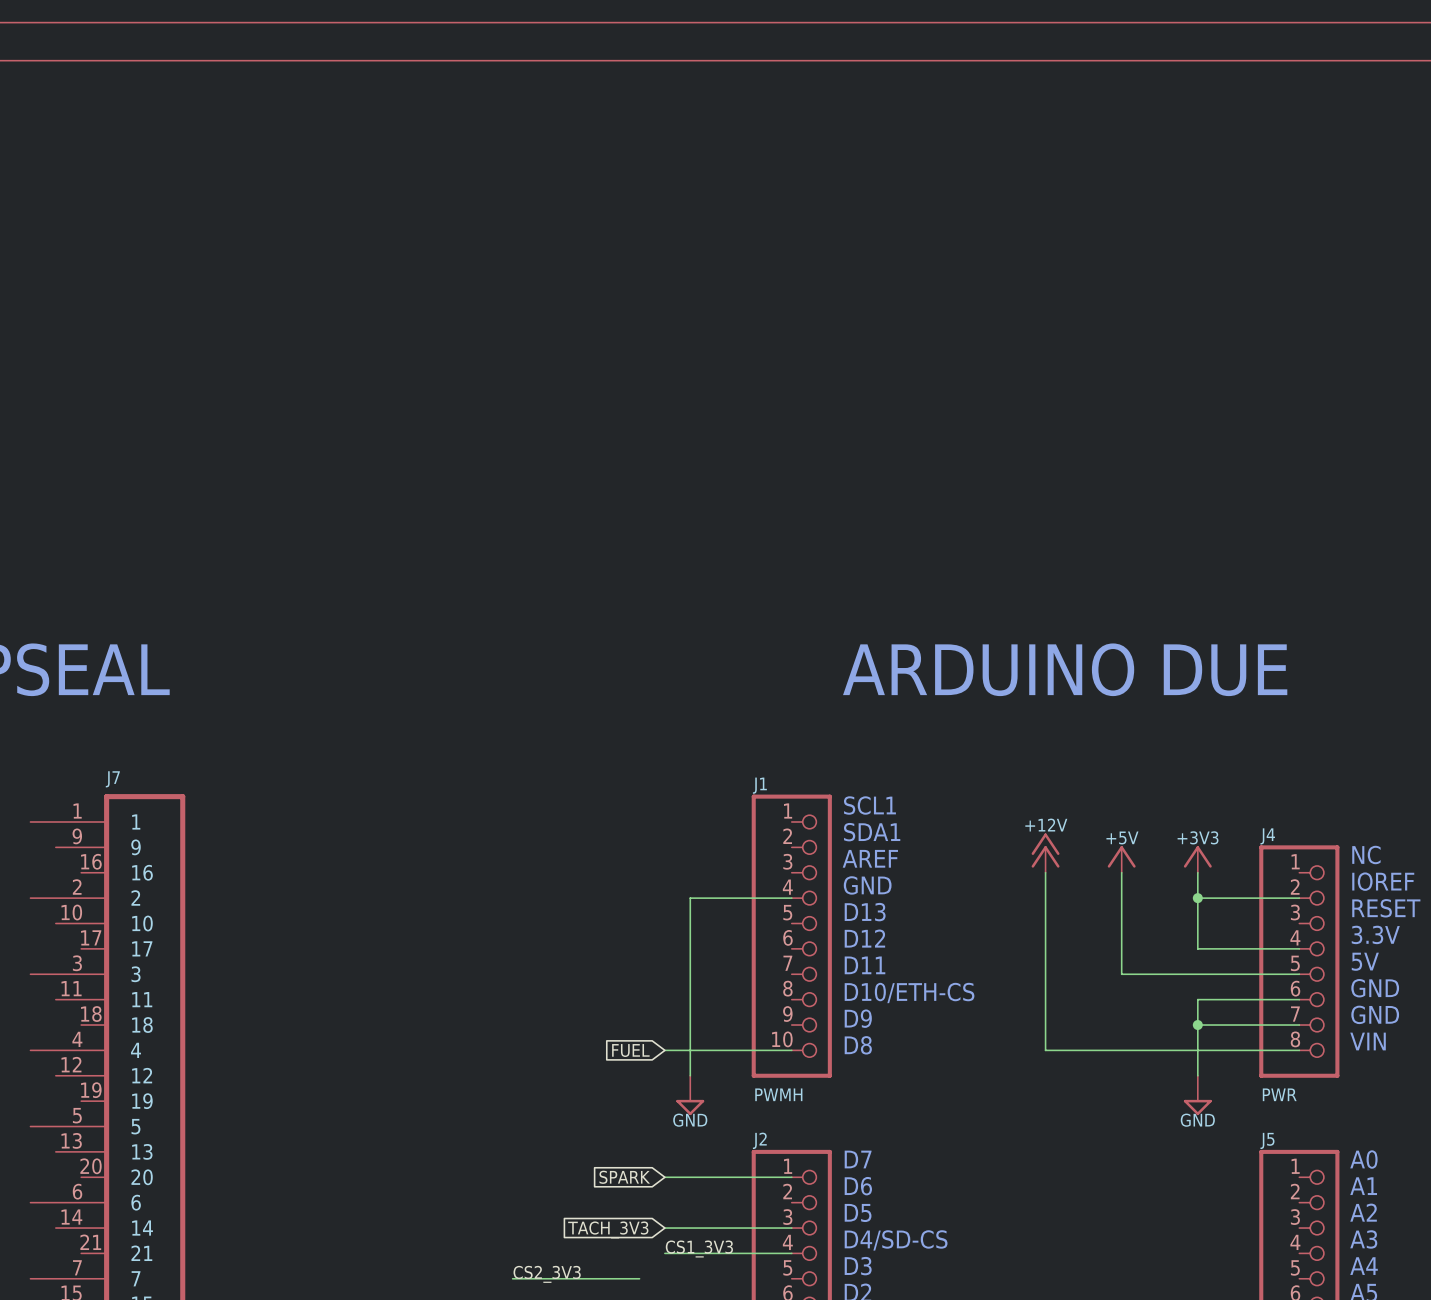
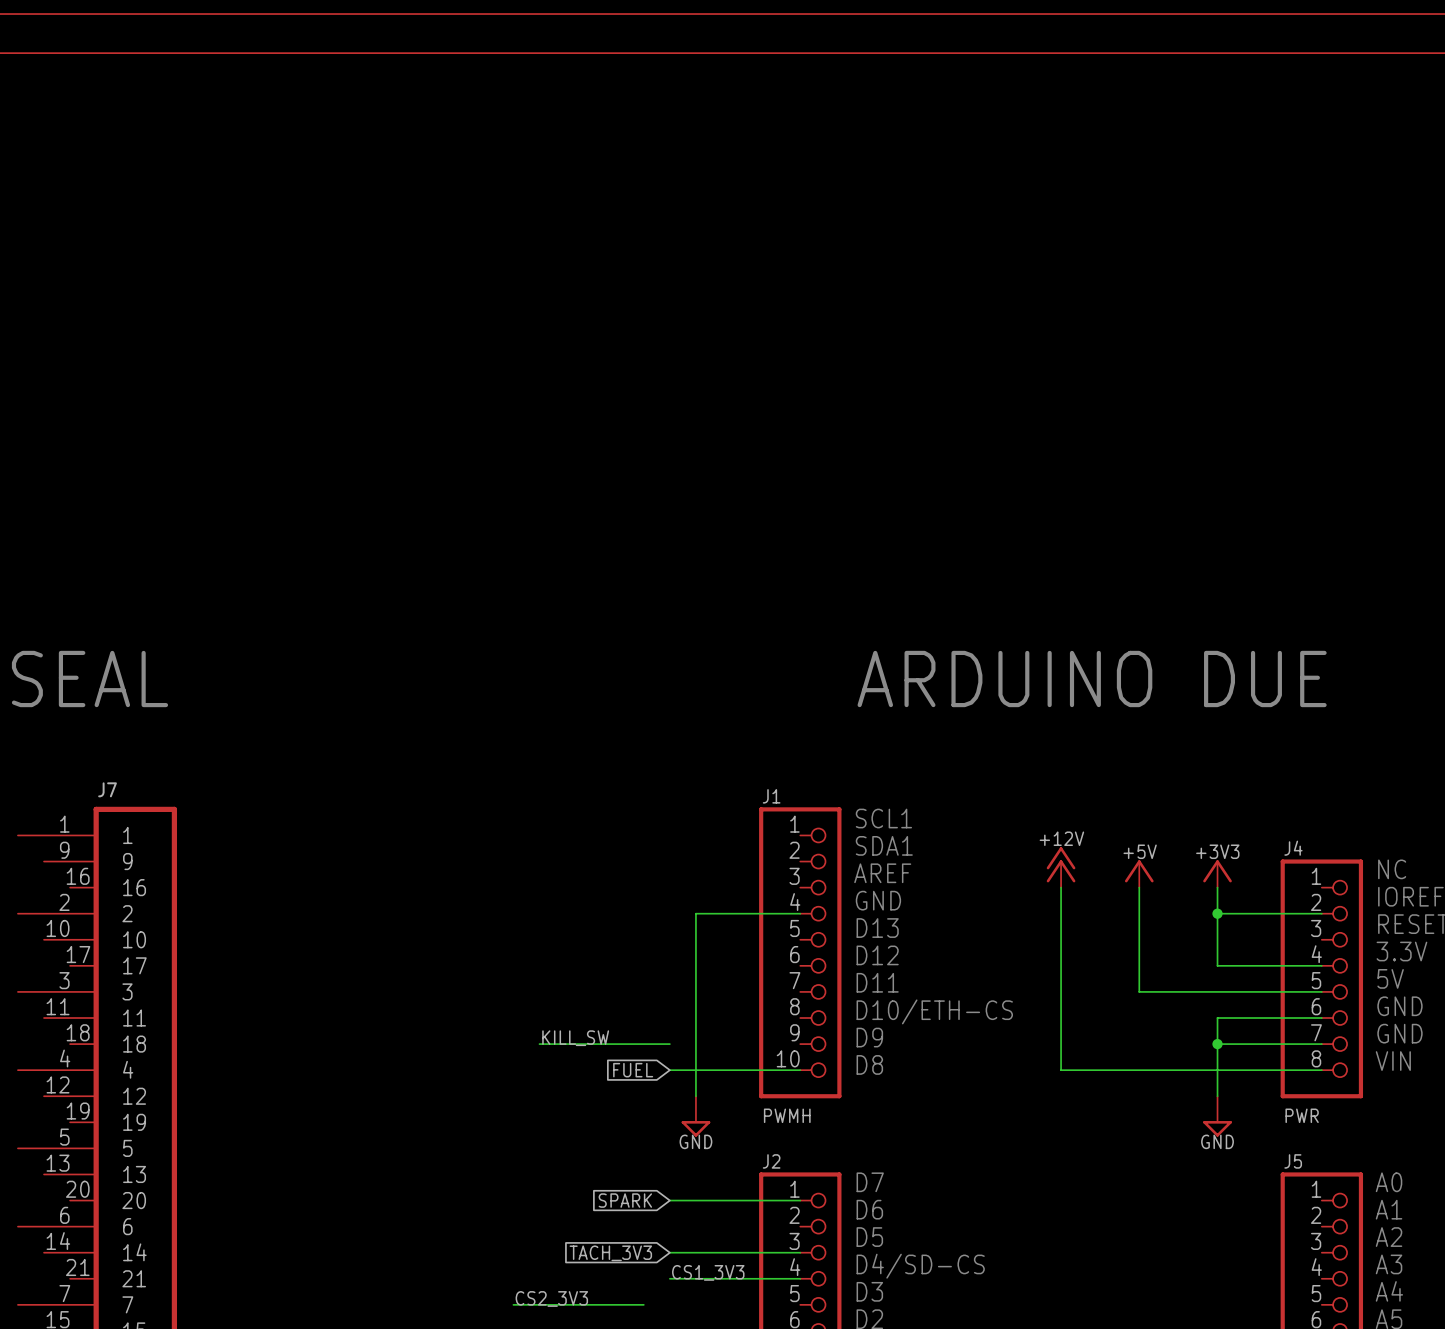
label: none -> KILL_SW (575, 1038)
wire: none -> (539, 1044) (669, 1044)

